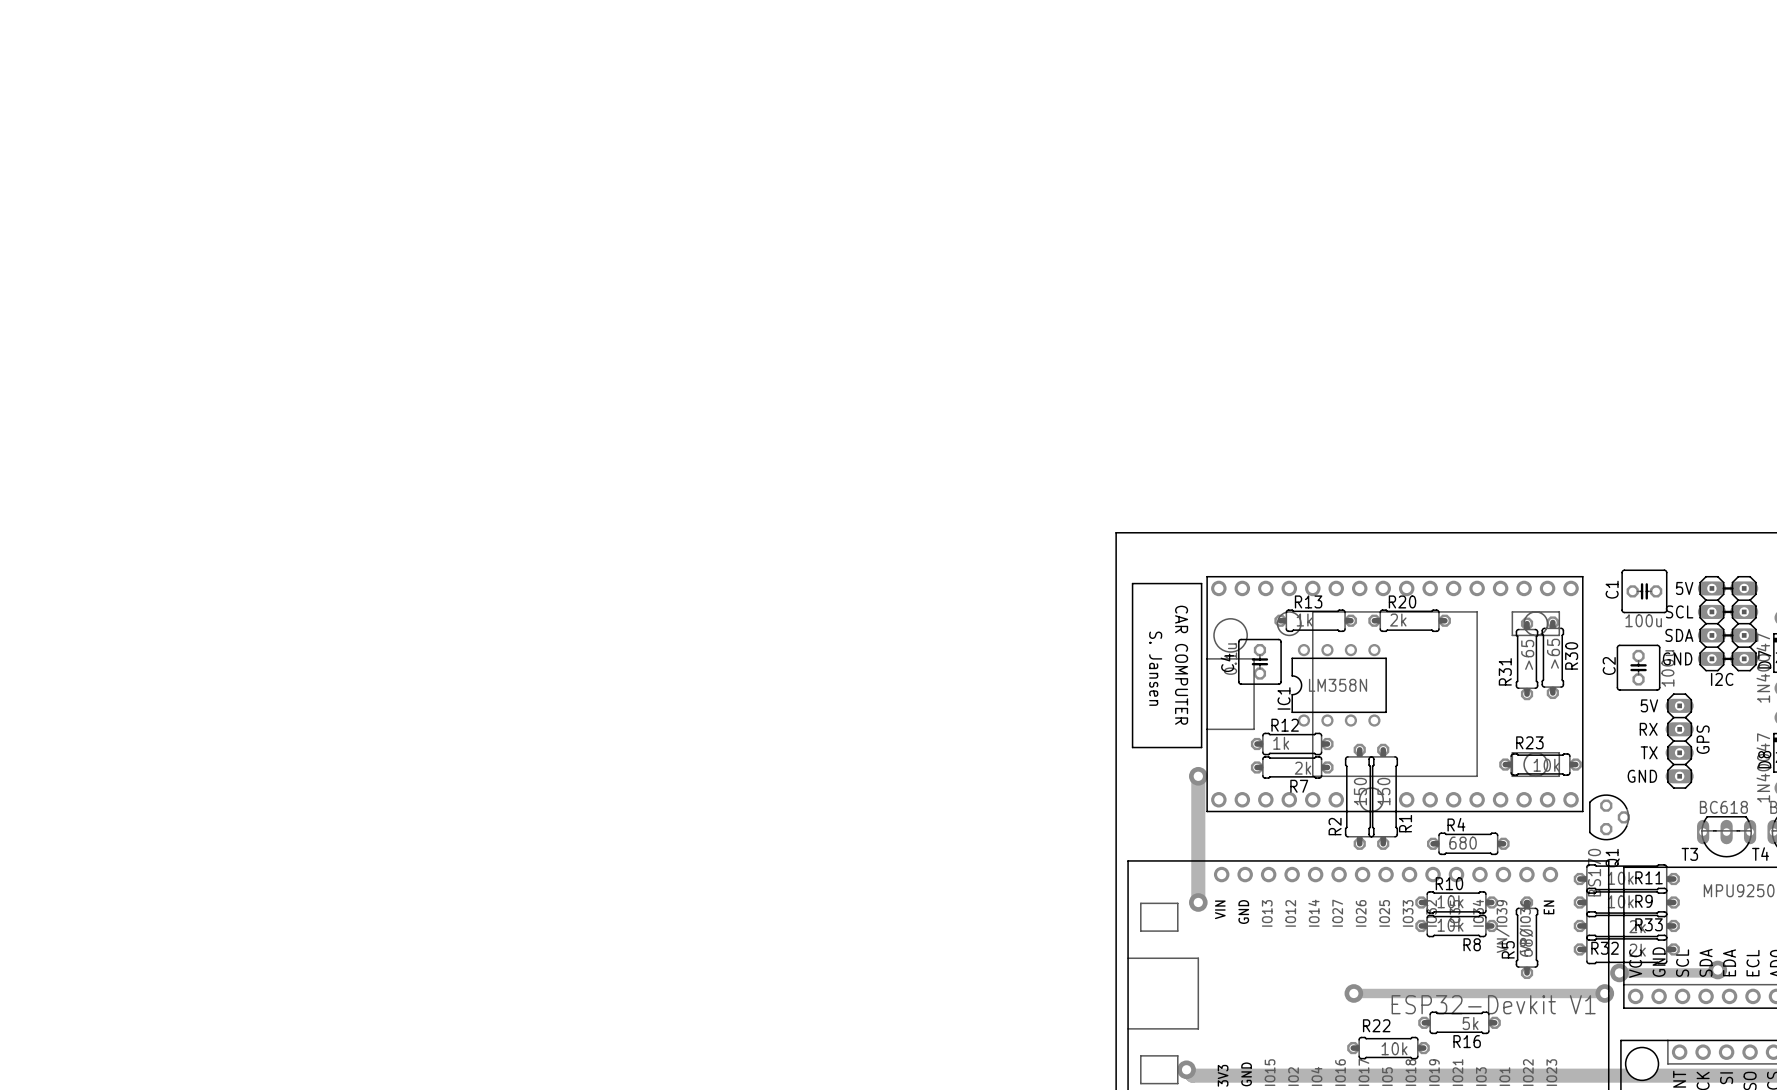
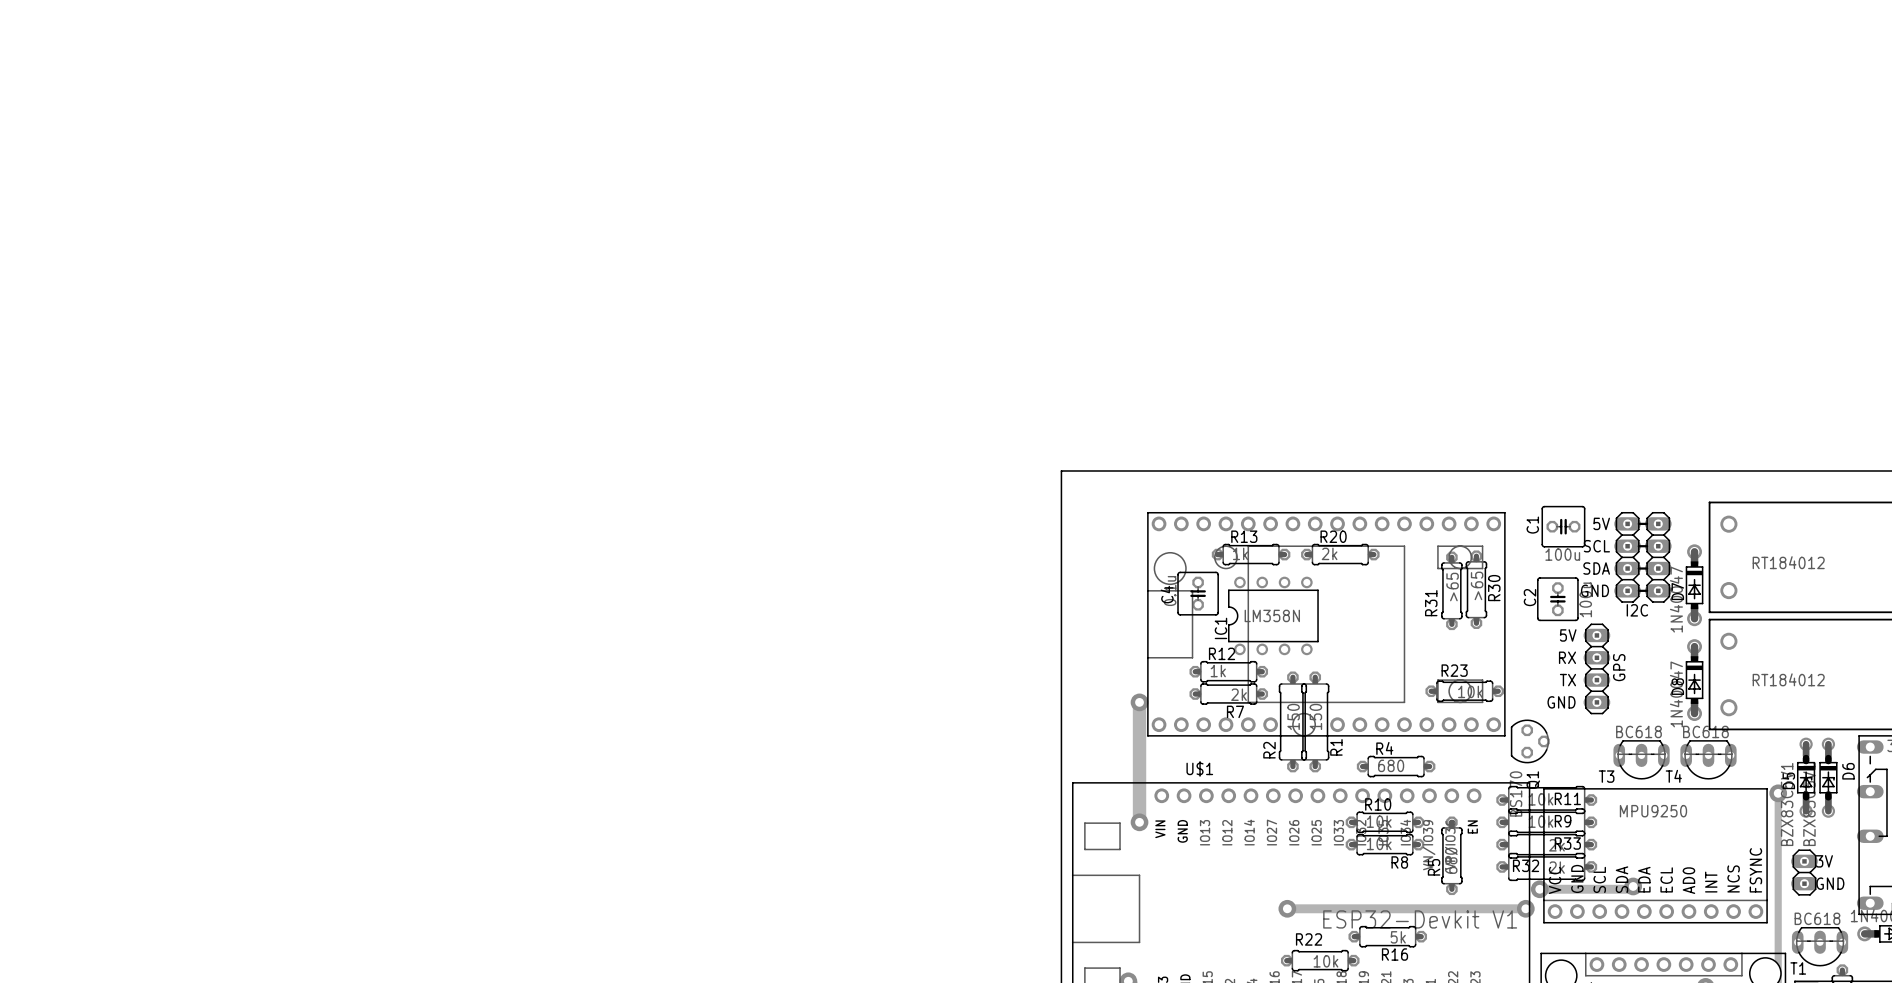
line: (1132, 583) (1201, 583) (1201, 747) (1132, 747) (1132, 583) -> none
text: CAR COMPUTER (1181, 665) -> none
text: S. Jansen (1155, 668) -> none
U$1 name: none -> U$1 (1199, 768)

